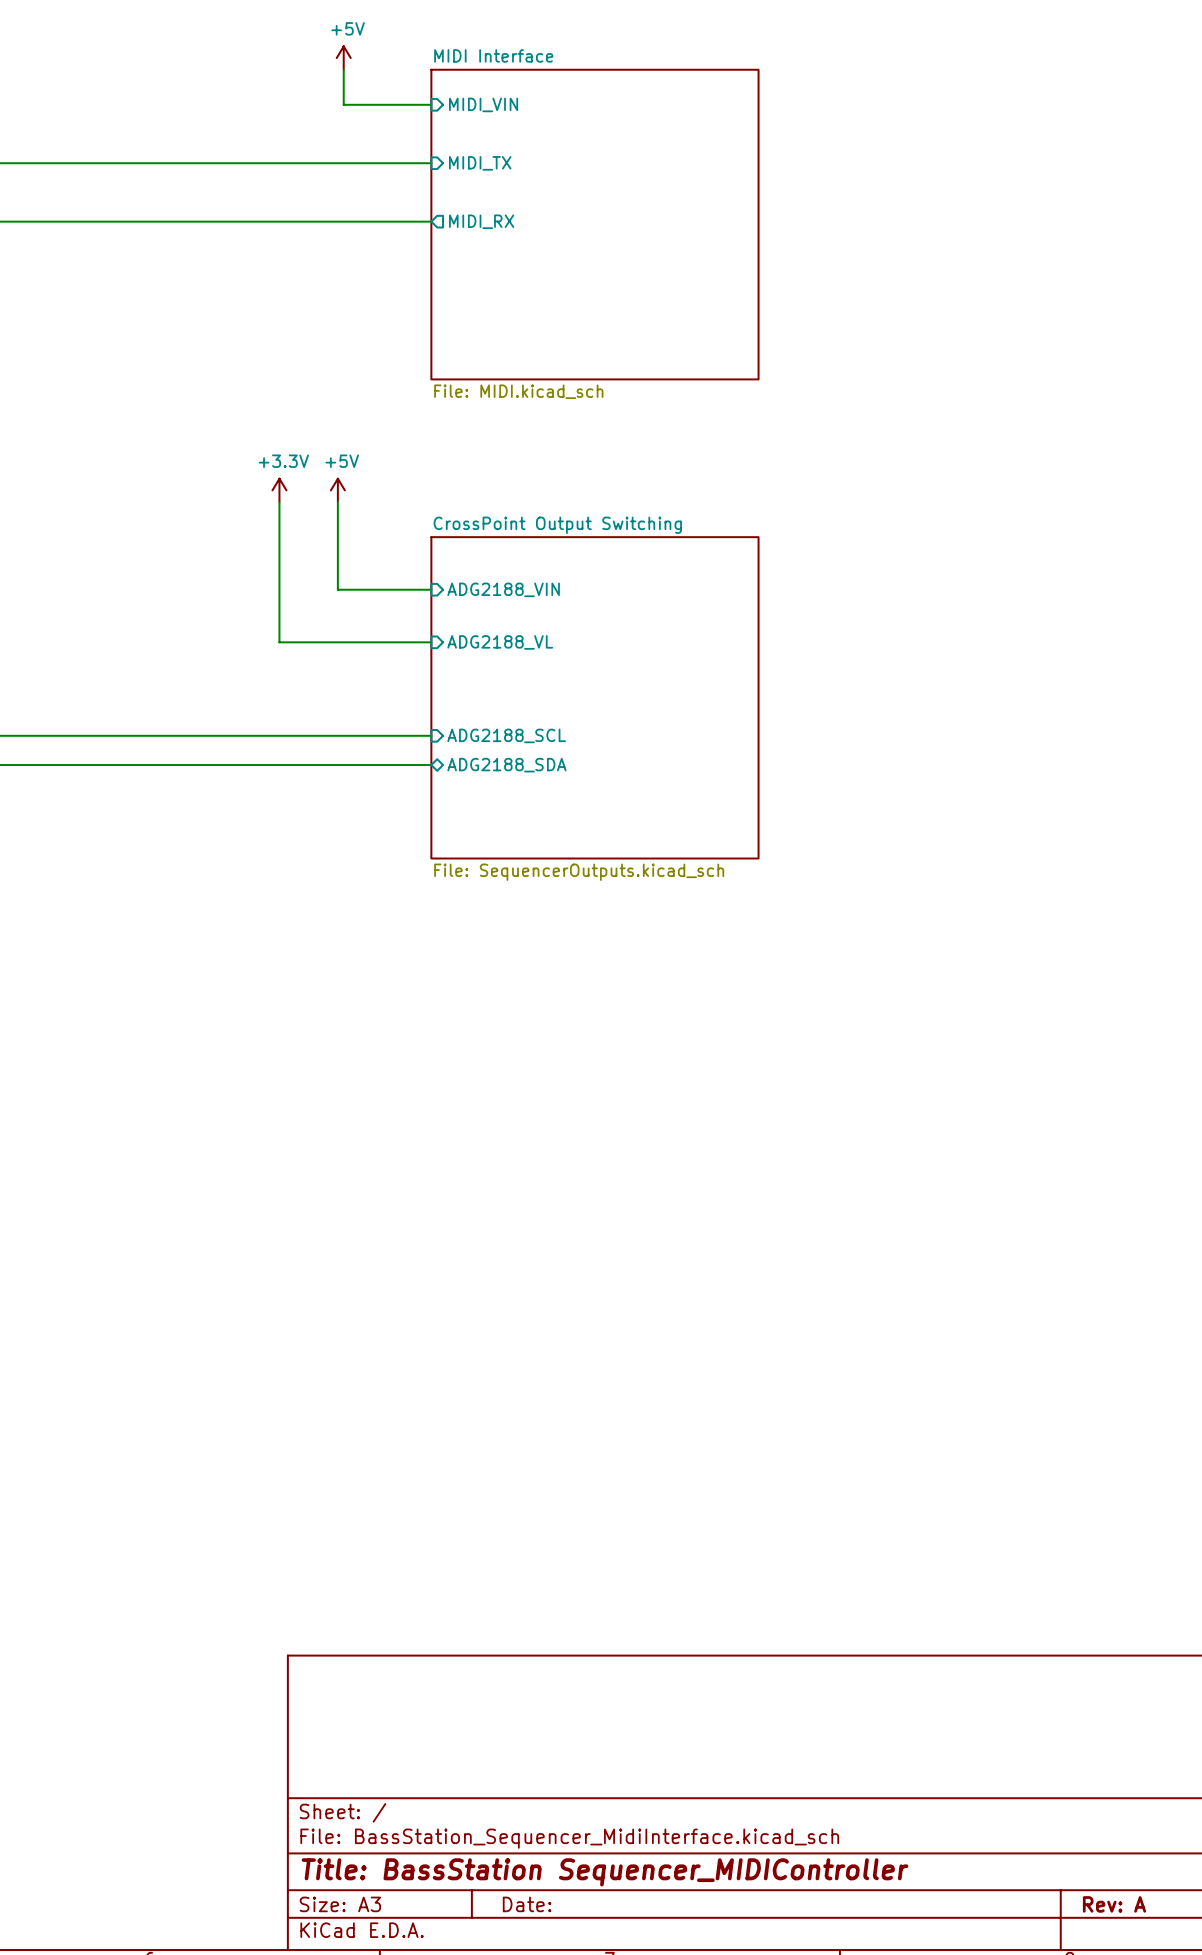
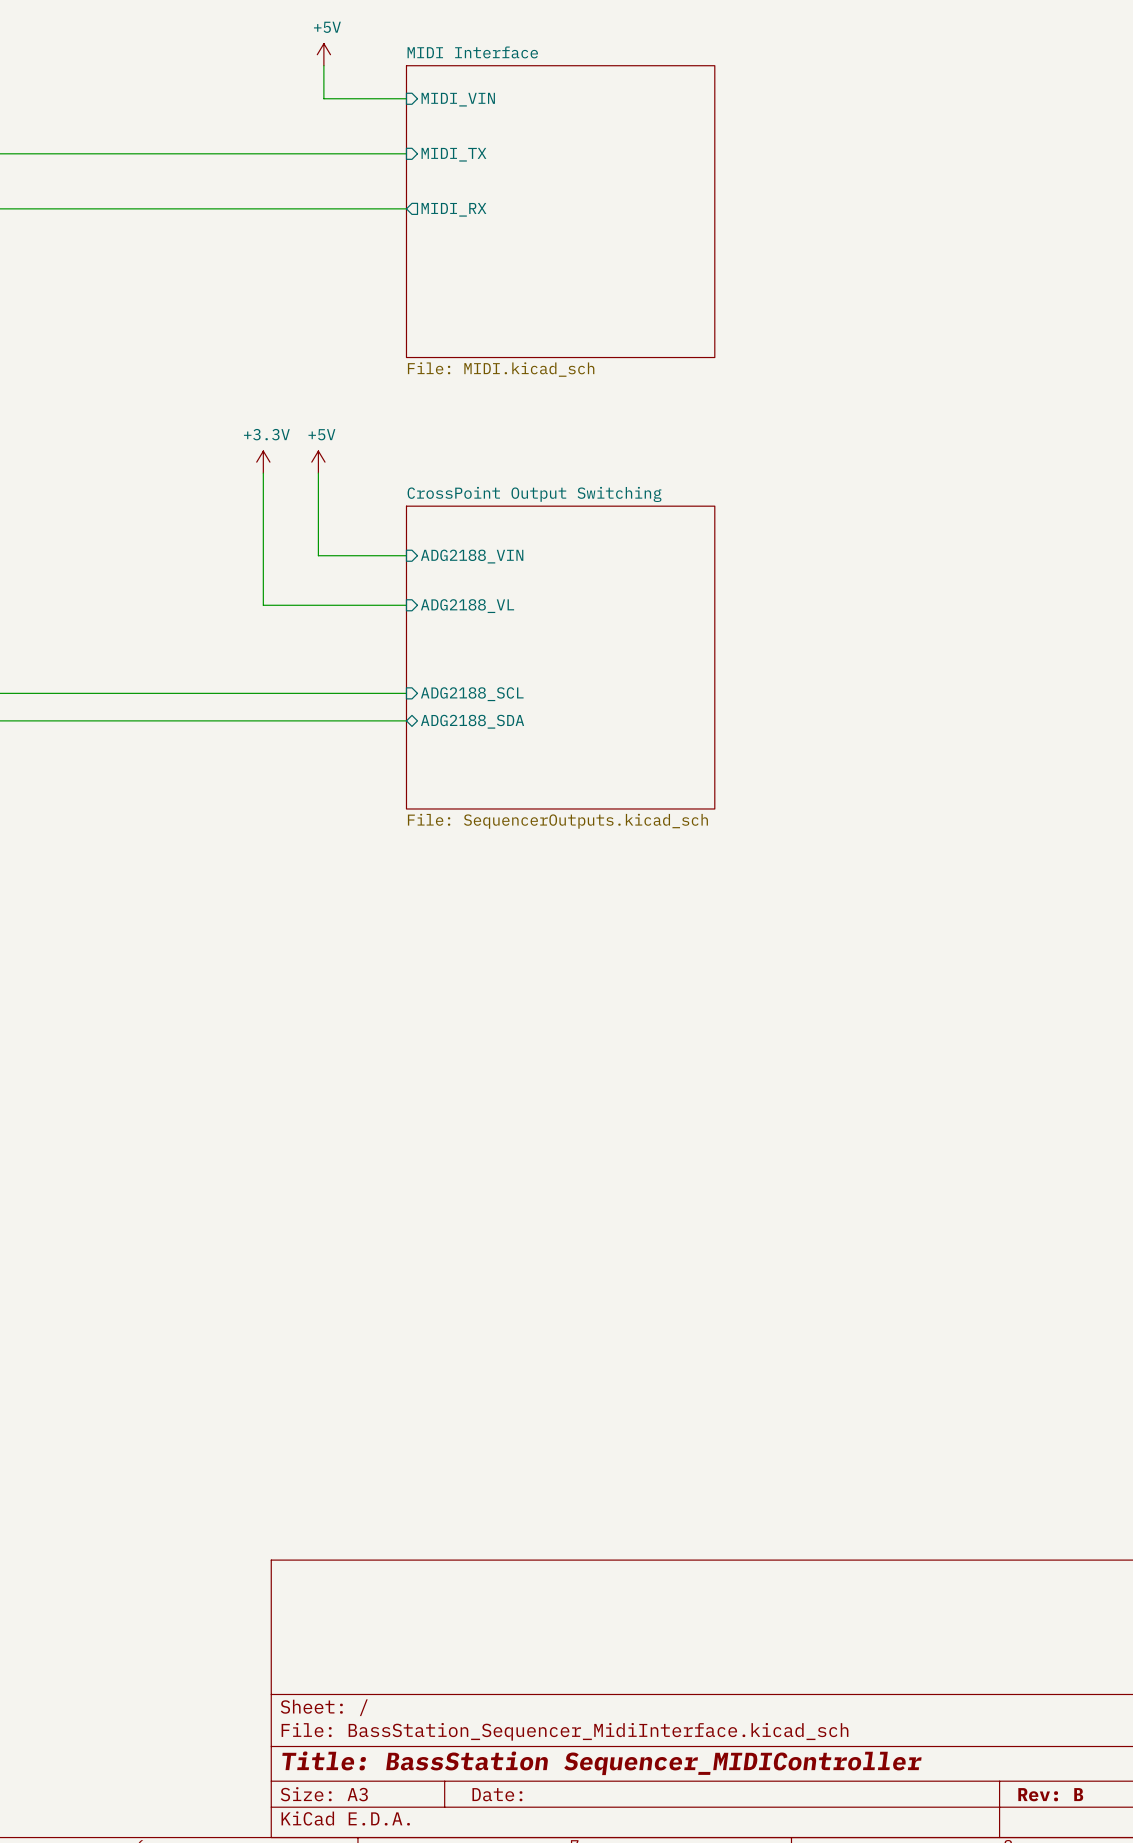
title block: Rev: A (1114, 1904) -> Rev: B (1050, 1794)

